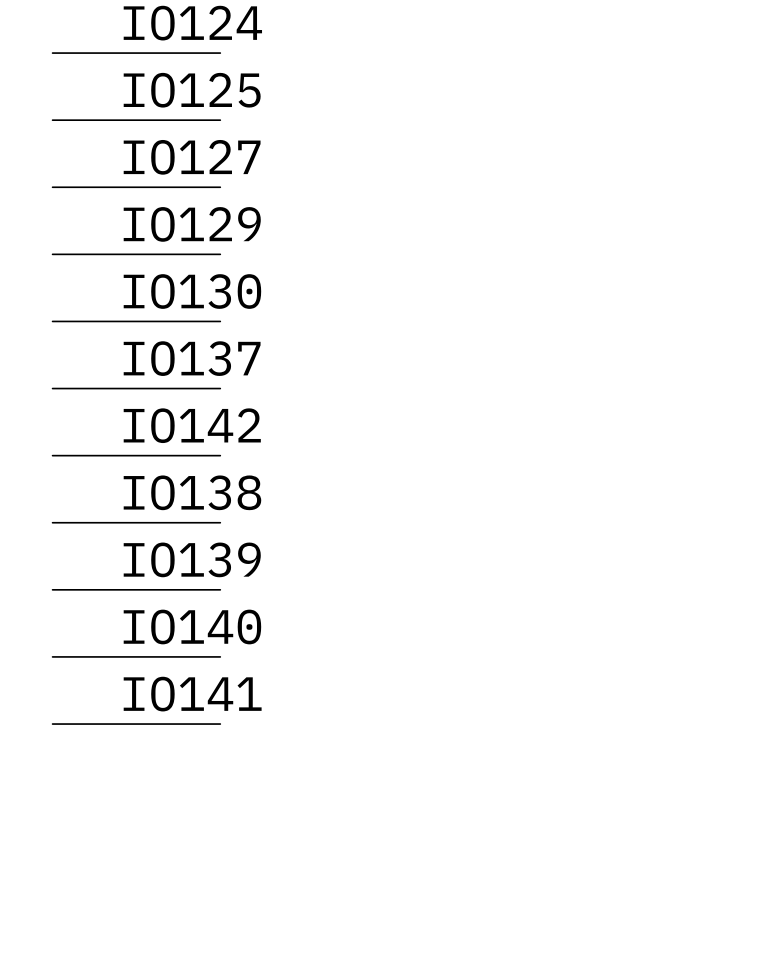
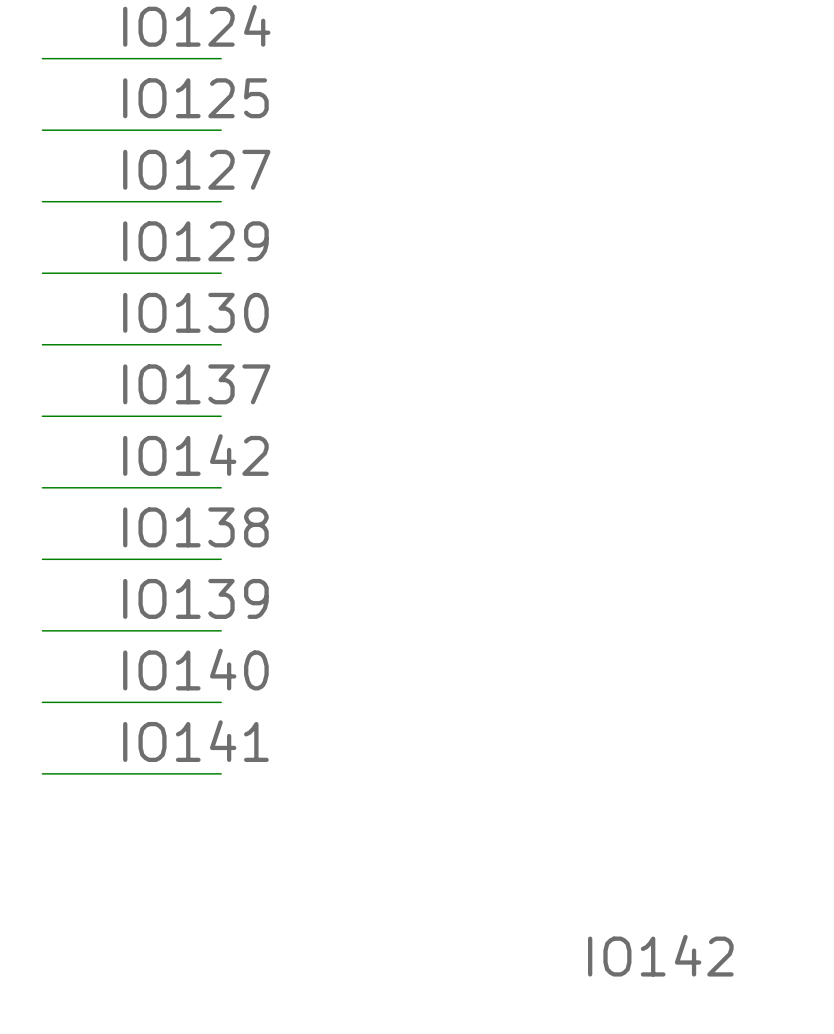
label: none -> IO142 (660, 955)

